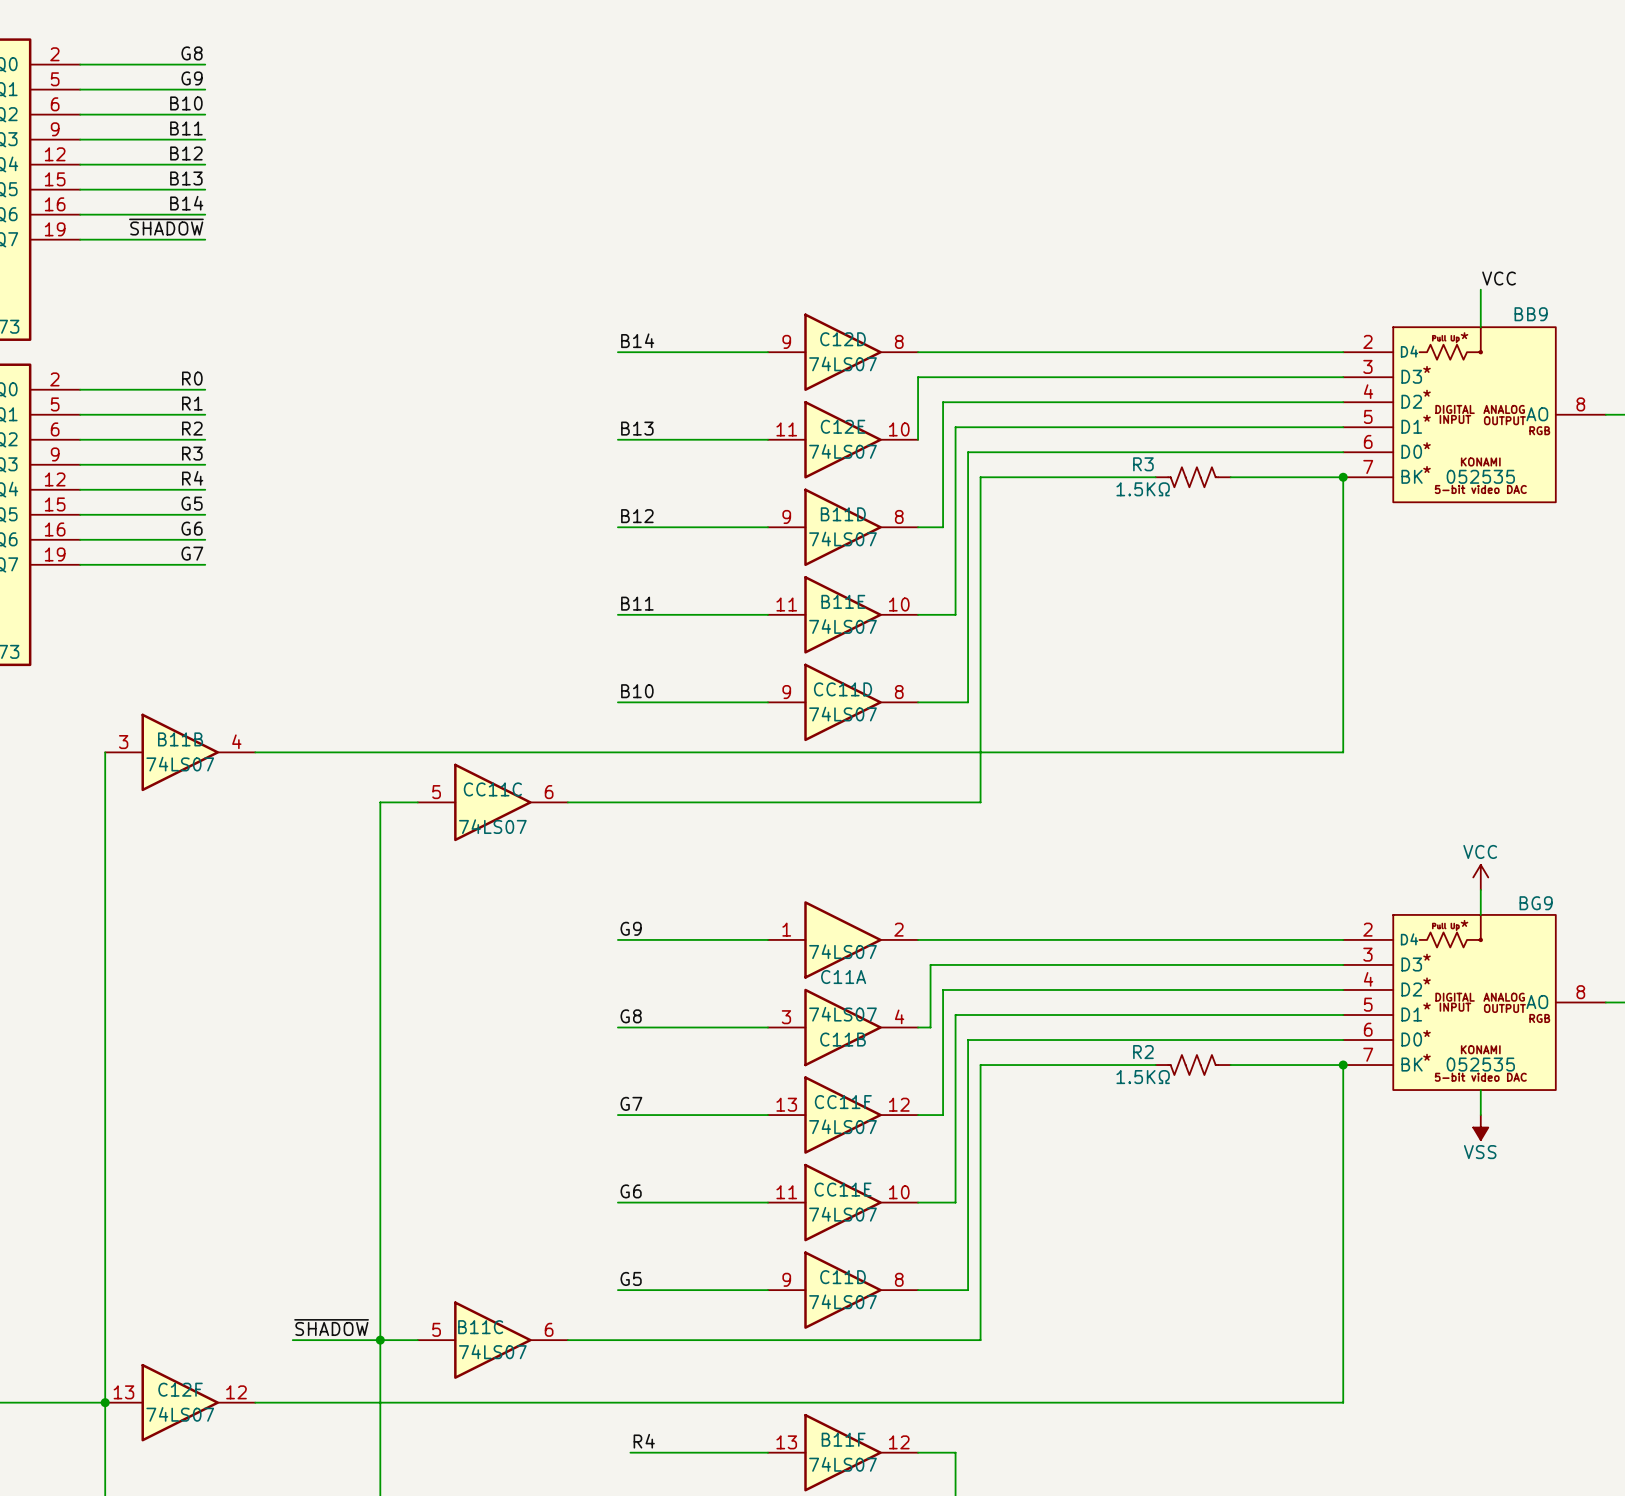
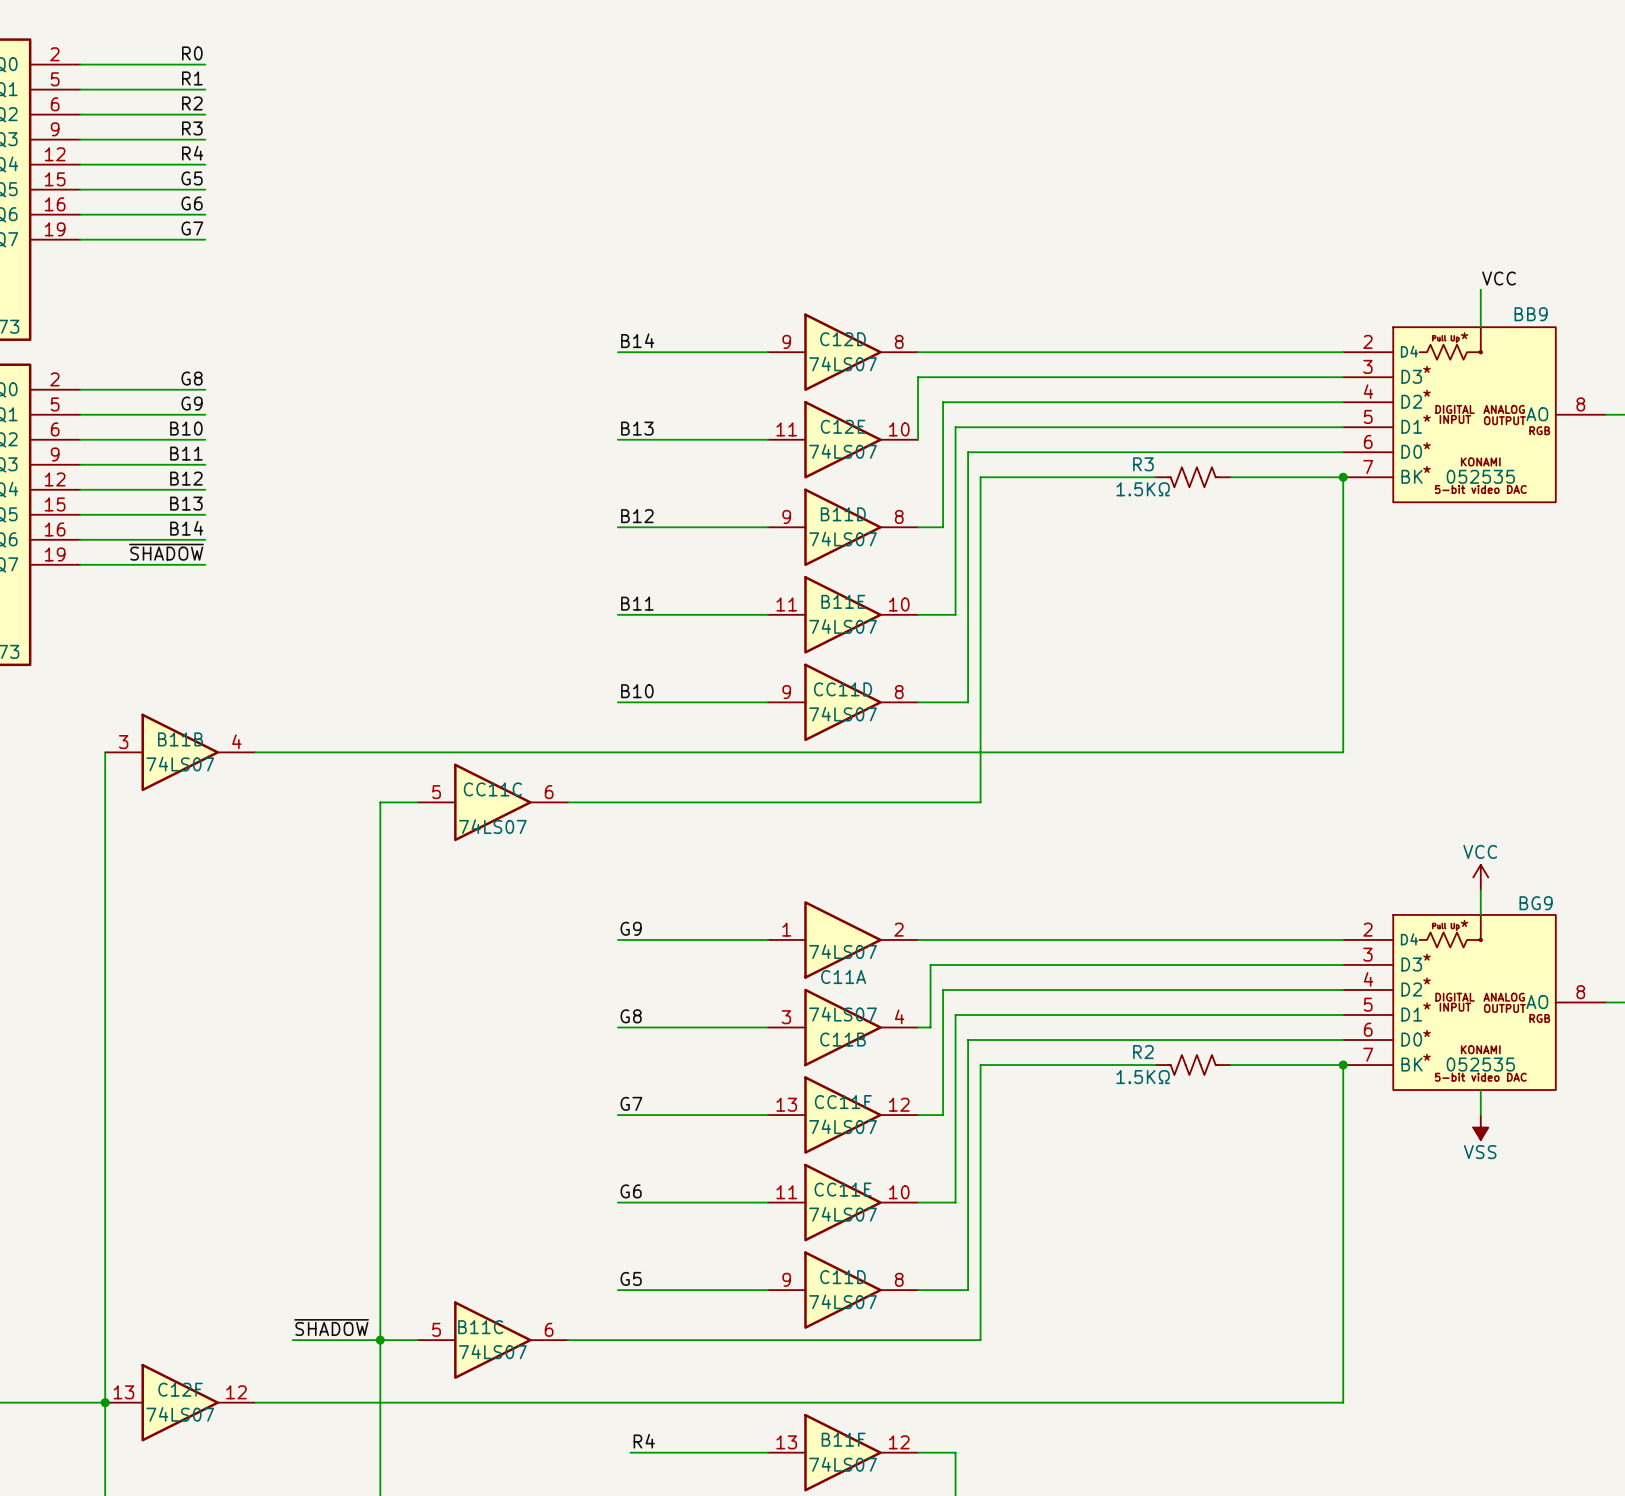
label: G8 (192, 53) -> R0 (192, 53)
label: G9 (192, 78) -> R1 (192, 78)
label: B10 (186, 103) -> R2 (192, 103)
label: B11 (186, 128) -> R3 (192, 128)
label: B12 (186, 153) -> R4 (192, 153)
label: B13 (186, 178) -> G5 (192, 178)
label: B14 (186, 203) -> G6 (192, 203)
label: ~{SHADOW} (166, 227) -> G7 (192, 228)
label: R0 (192, 378) -> G8 (192, 378)
label: R1 (192, 403) -> G9 (192, 403)
label: R2 (192, 428) -> B10 (186, 428)
label: R3 (192, 453) -> B11 (186, 453)
label: R4 (192, 478) -> B12 (186, 478)
label: G5 (192, 503) -> B13 (186, 503)
label: G6 (192, 528) -> B14 (186, 528)
label: G7 (192, 553) -> ~{SHADOW} (166, 552)

